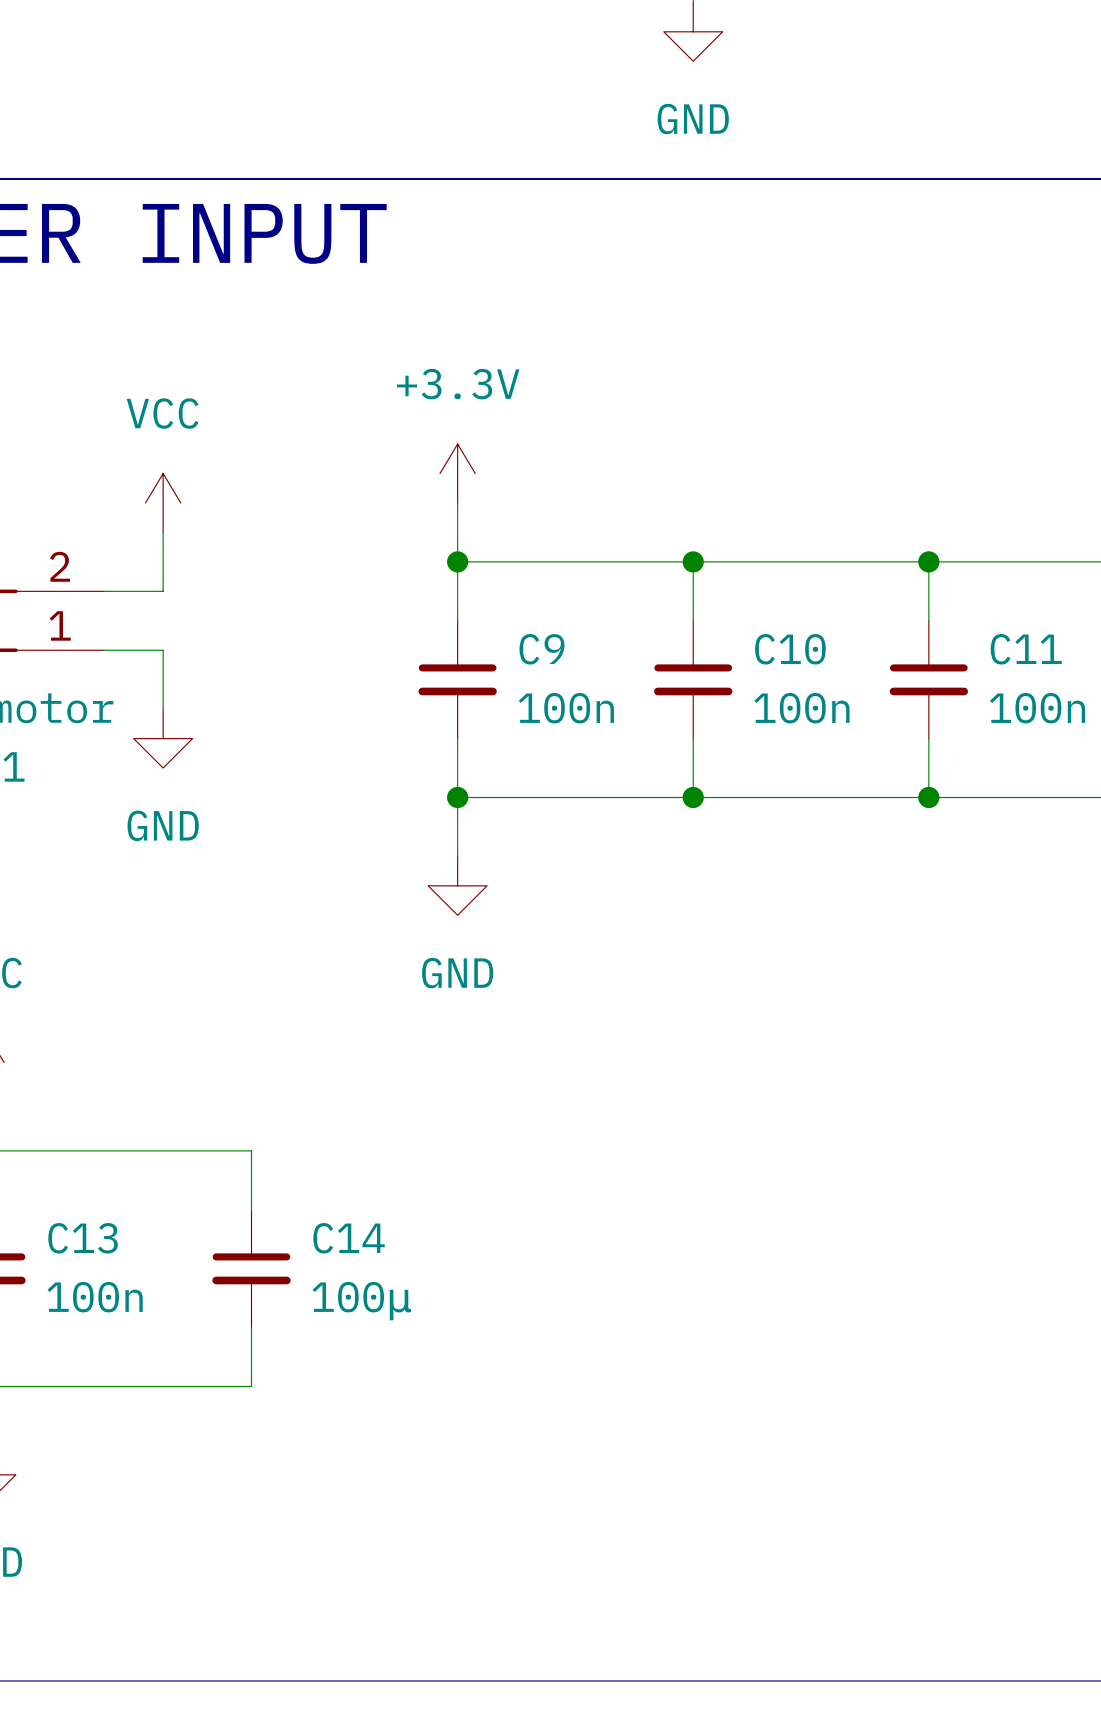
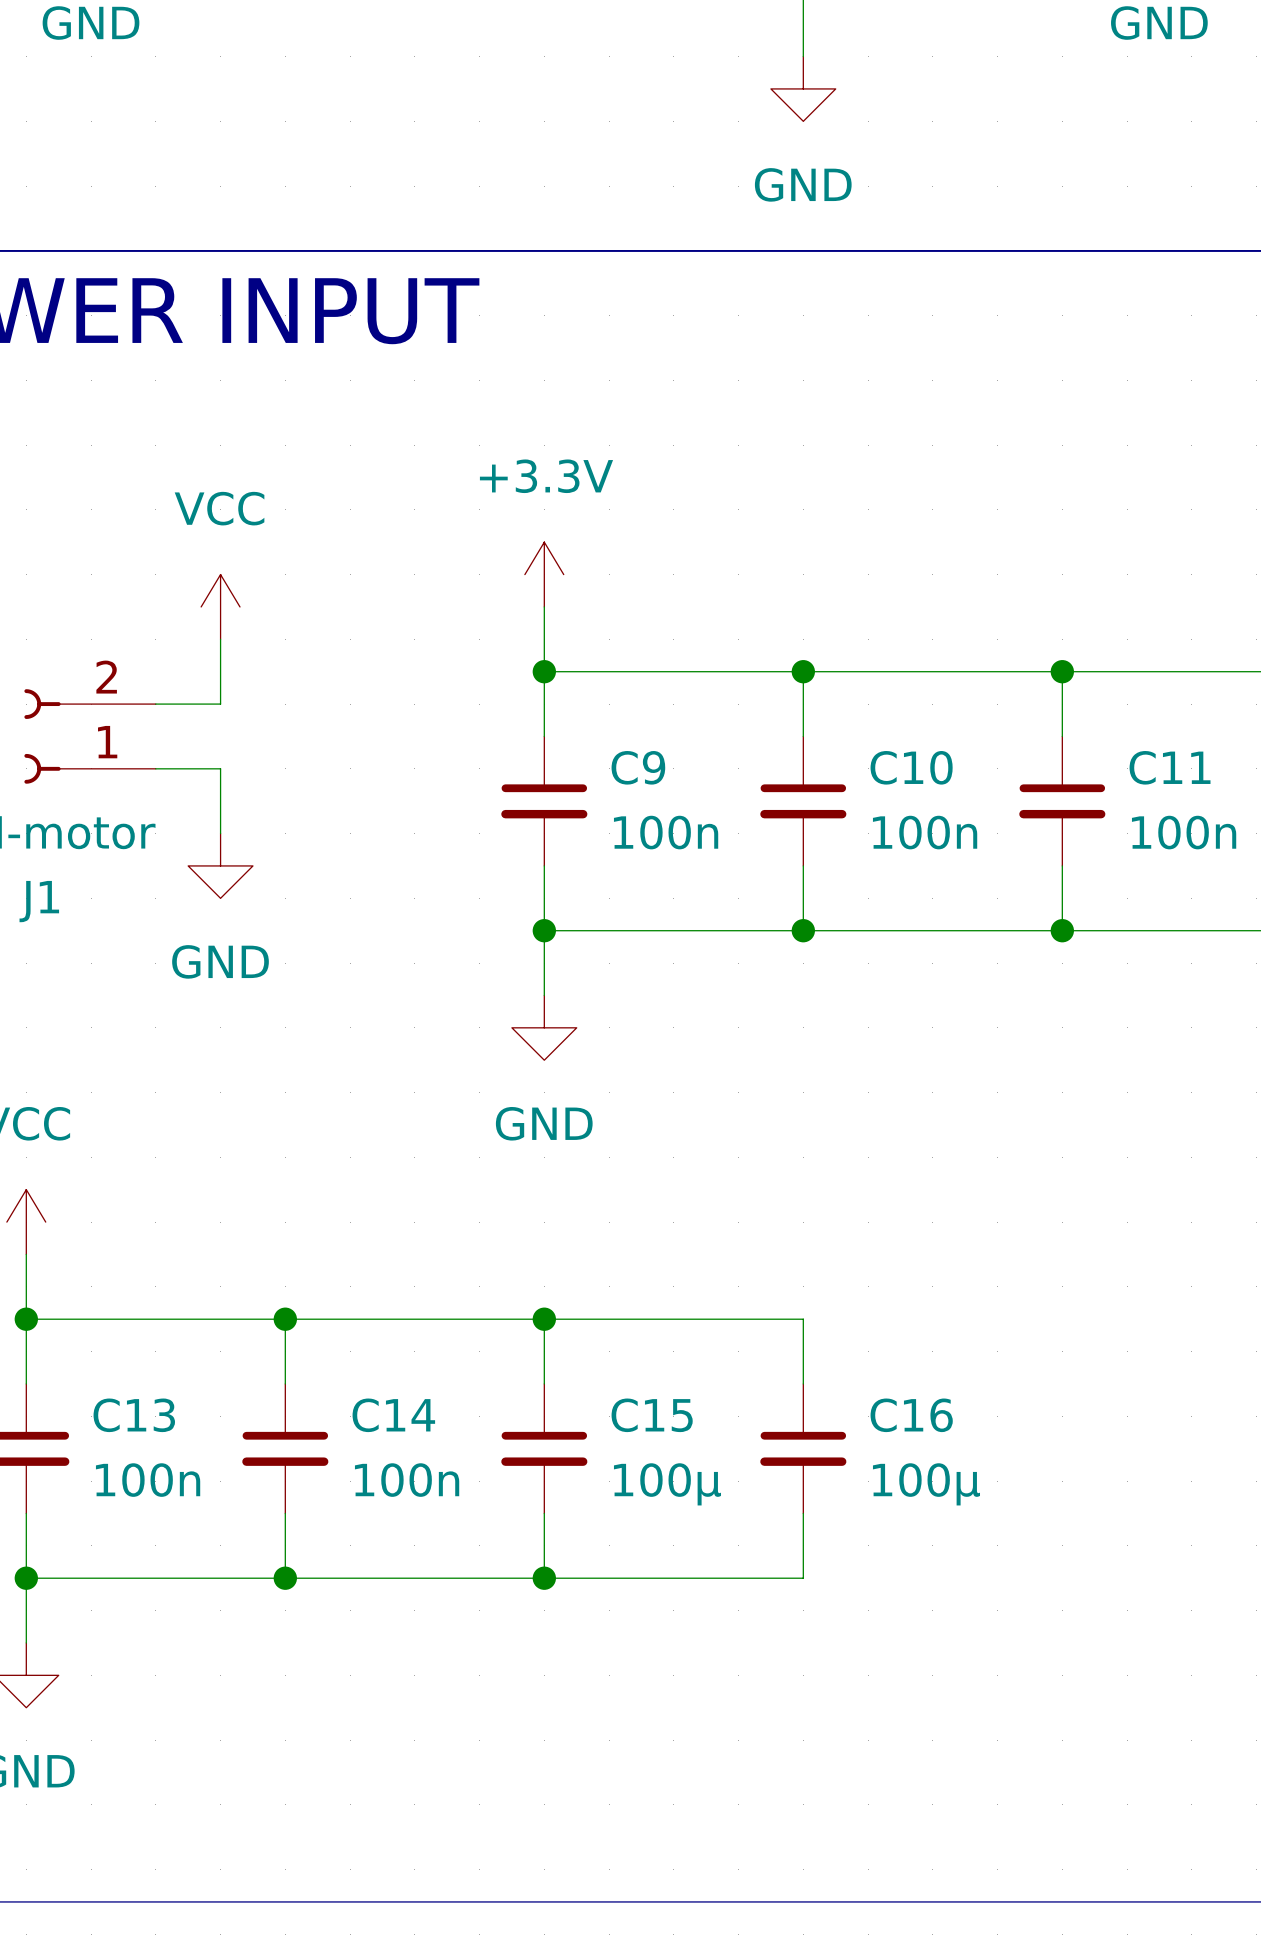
wire: none -> (285, 1319) (285, 1383)
junction: none -> (285, 1319)
wire: (251, 1150) (251, 1209) -> (317, 1319) (803, 1319) (803, 1383)
wire: none -> (544, 1319) (544, 1383)
junction: none -> (544, 1319)
C14 position: (251, 1268) -> (285, 1448)
C15: none -> 100μ (544, 1448)
C16: none -> 100μ (803, 1448)
C14 value: 100μ (361, 1301) -> 100n (407, 1480)
wire: none -> (285, 1513) (285, 1578)
wire: (251, 1327) (251, 1386) -> (803, 1513) (803, 1578) (317, 1578)
wire: none -> (544, 1513) (544, 1578)
junction: none -> (285, 1578)
junction: none -> (544, 1578)

